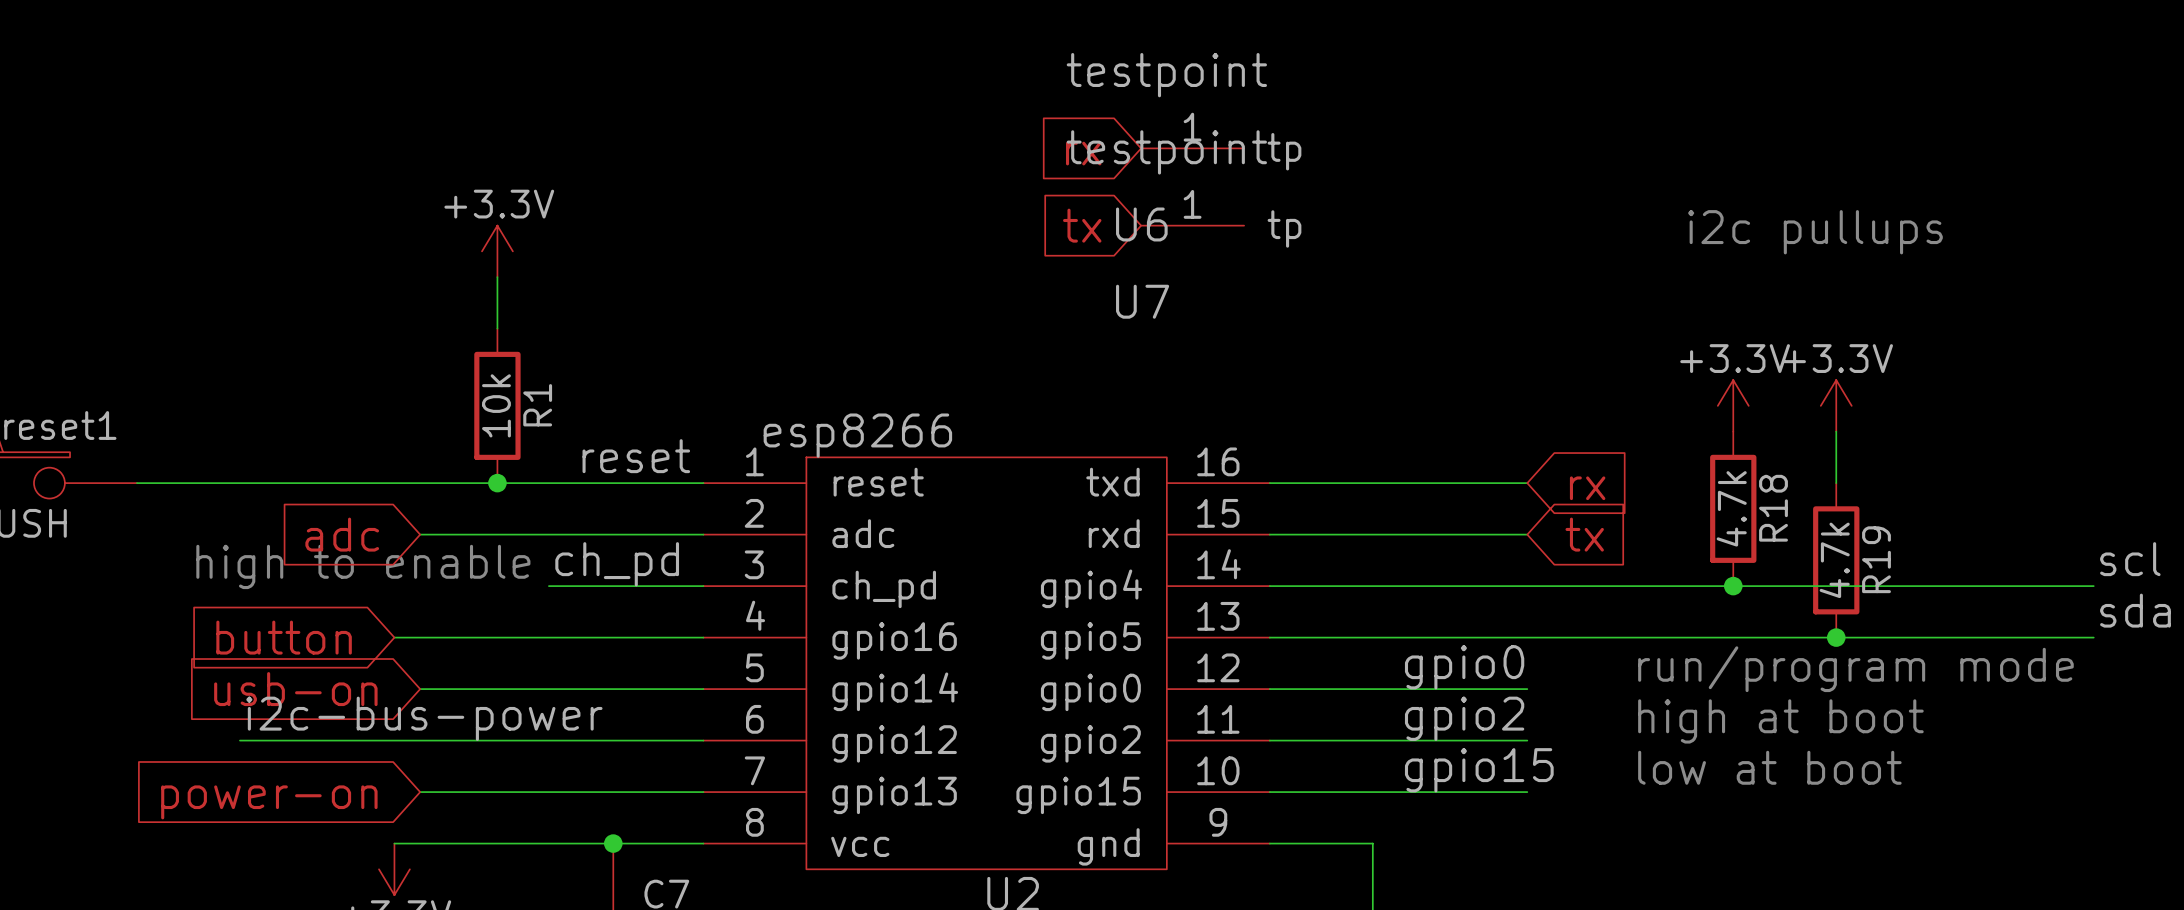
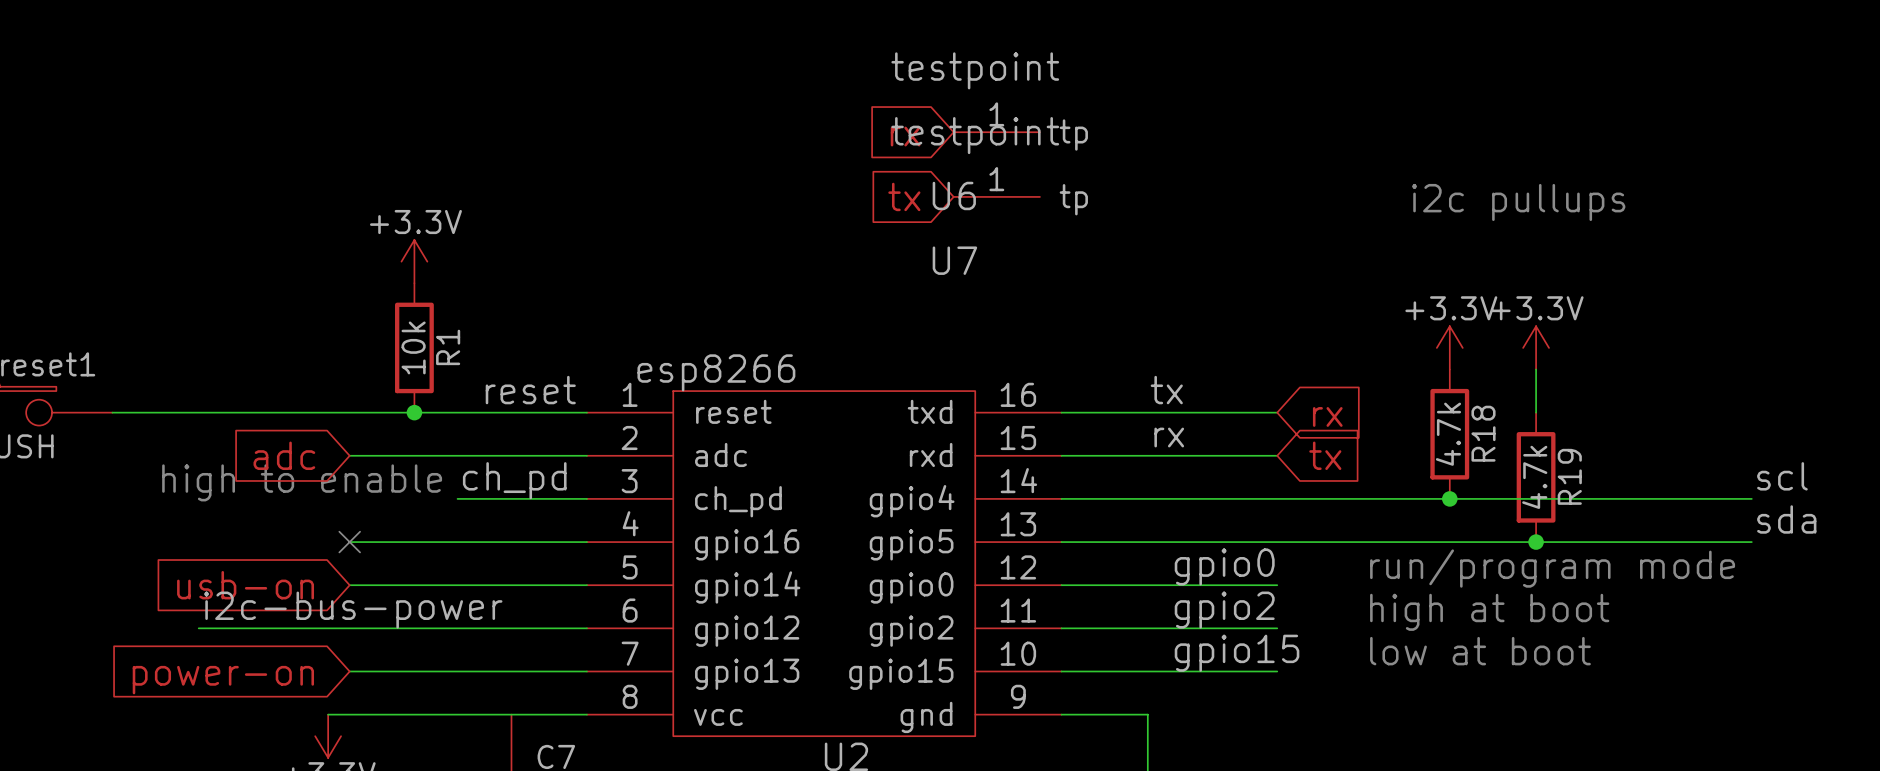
power symbol position: +3.3V (497, 251) -> +3.3V (414, 261)
label: none -> tx (1166, 390)
label: none -> rx (1169, 437)
global label: button (284, 637) -> none
wire: (394, 637) (420, 637) -> none
no-connect mark: none -> (349, 542)
junction: (613, 843) -> none

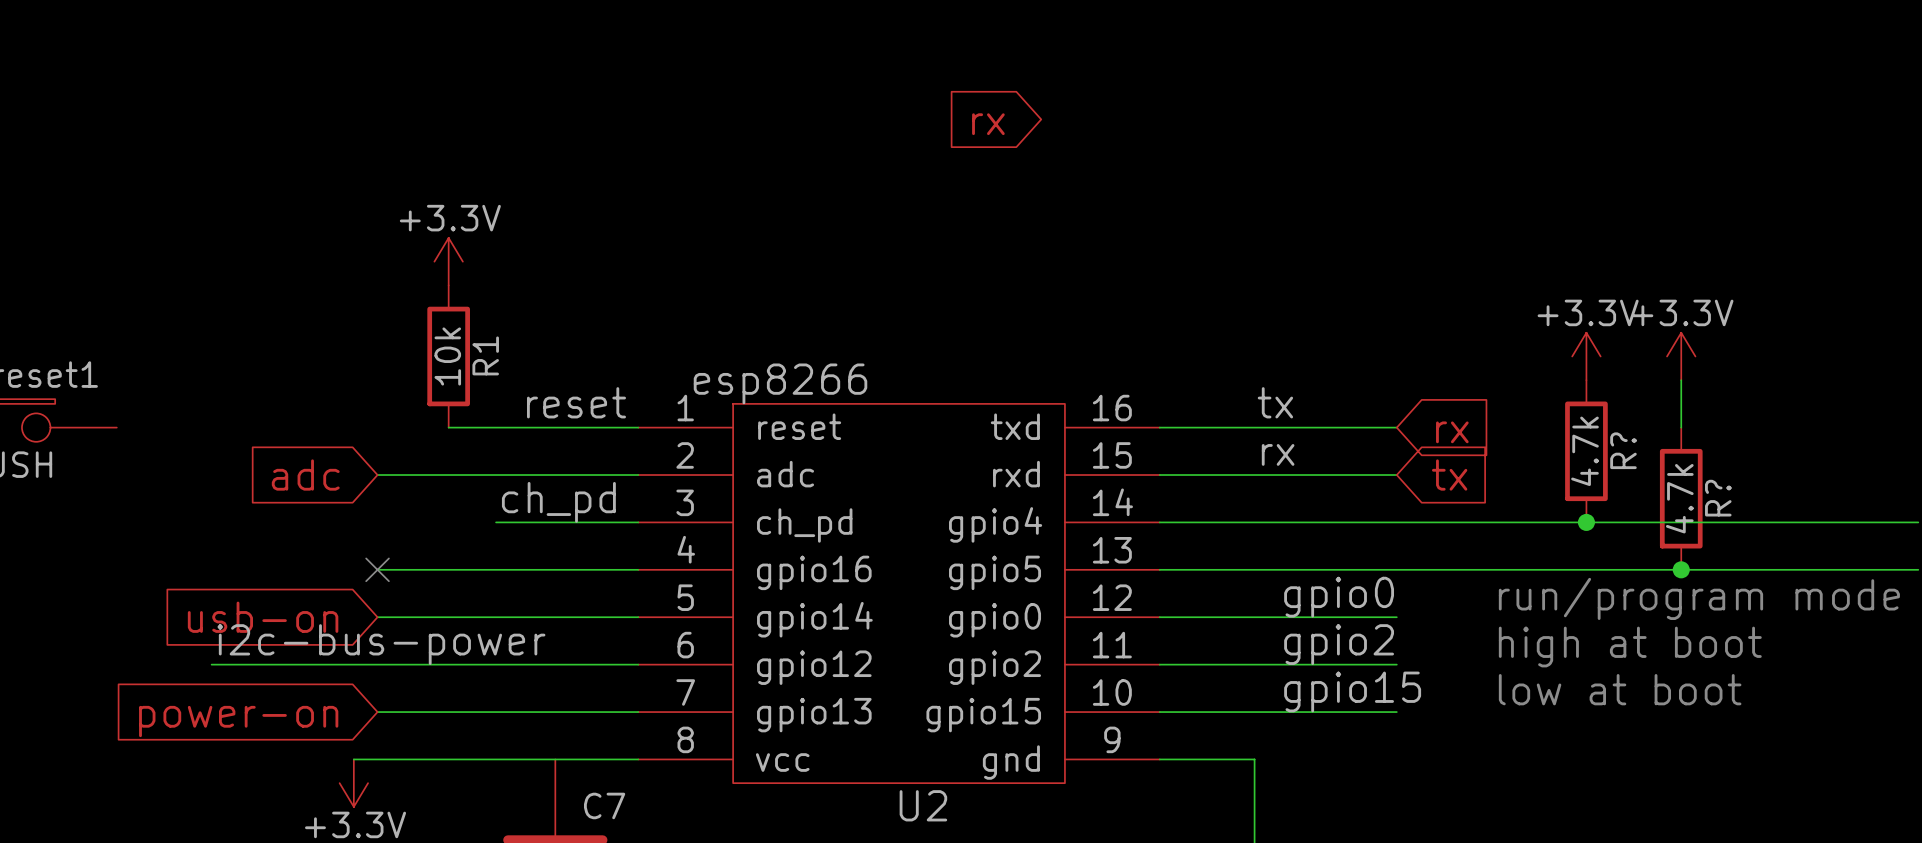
U6: testpoint (996, 132) -> none
global label: tx (904, 196) -> none
U7: testpoint (996, 196) -> none
text: i2c pullups (1518, 202) -> none
wire: (112, 412) (414, 412) -> none
junction: (414, 412) -> none
R18 name: R18 (1483, 433) -> R? (1623, 450)
R19 name: R19 (1569, 476) -> R? (1718, 498)
text: high to enable (302, 482) -> none

